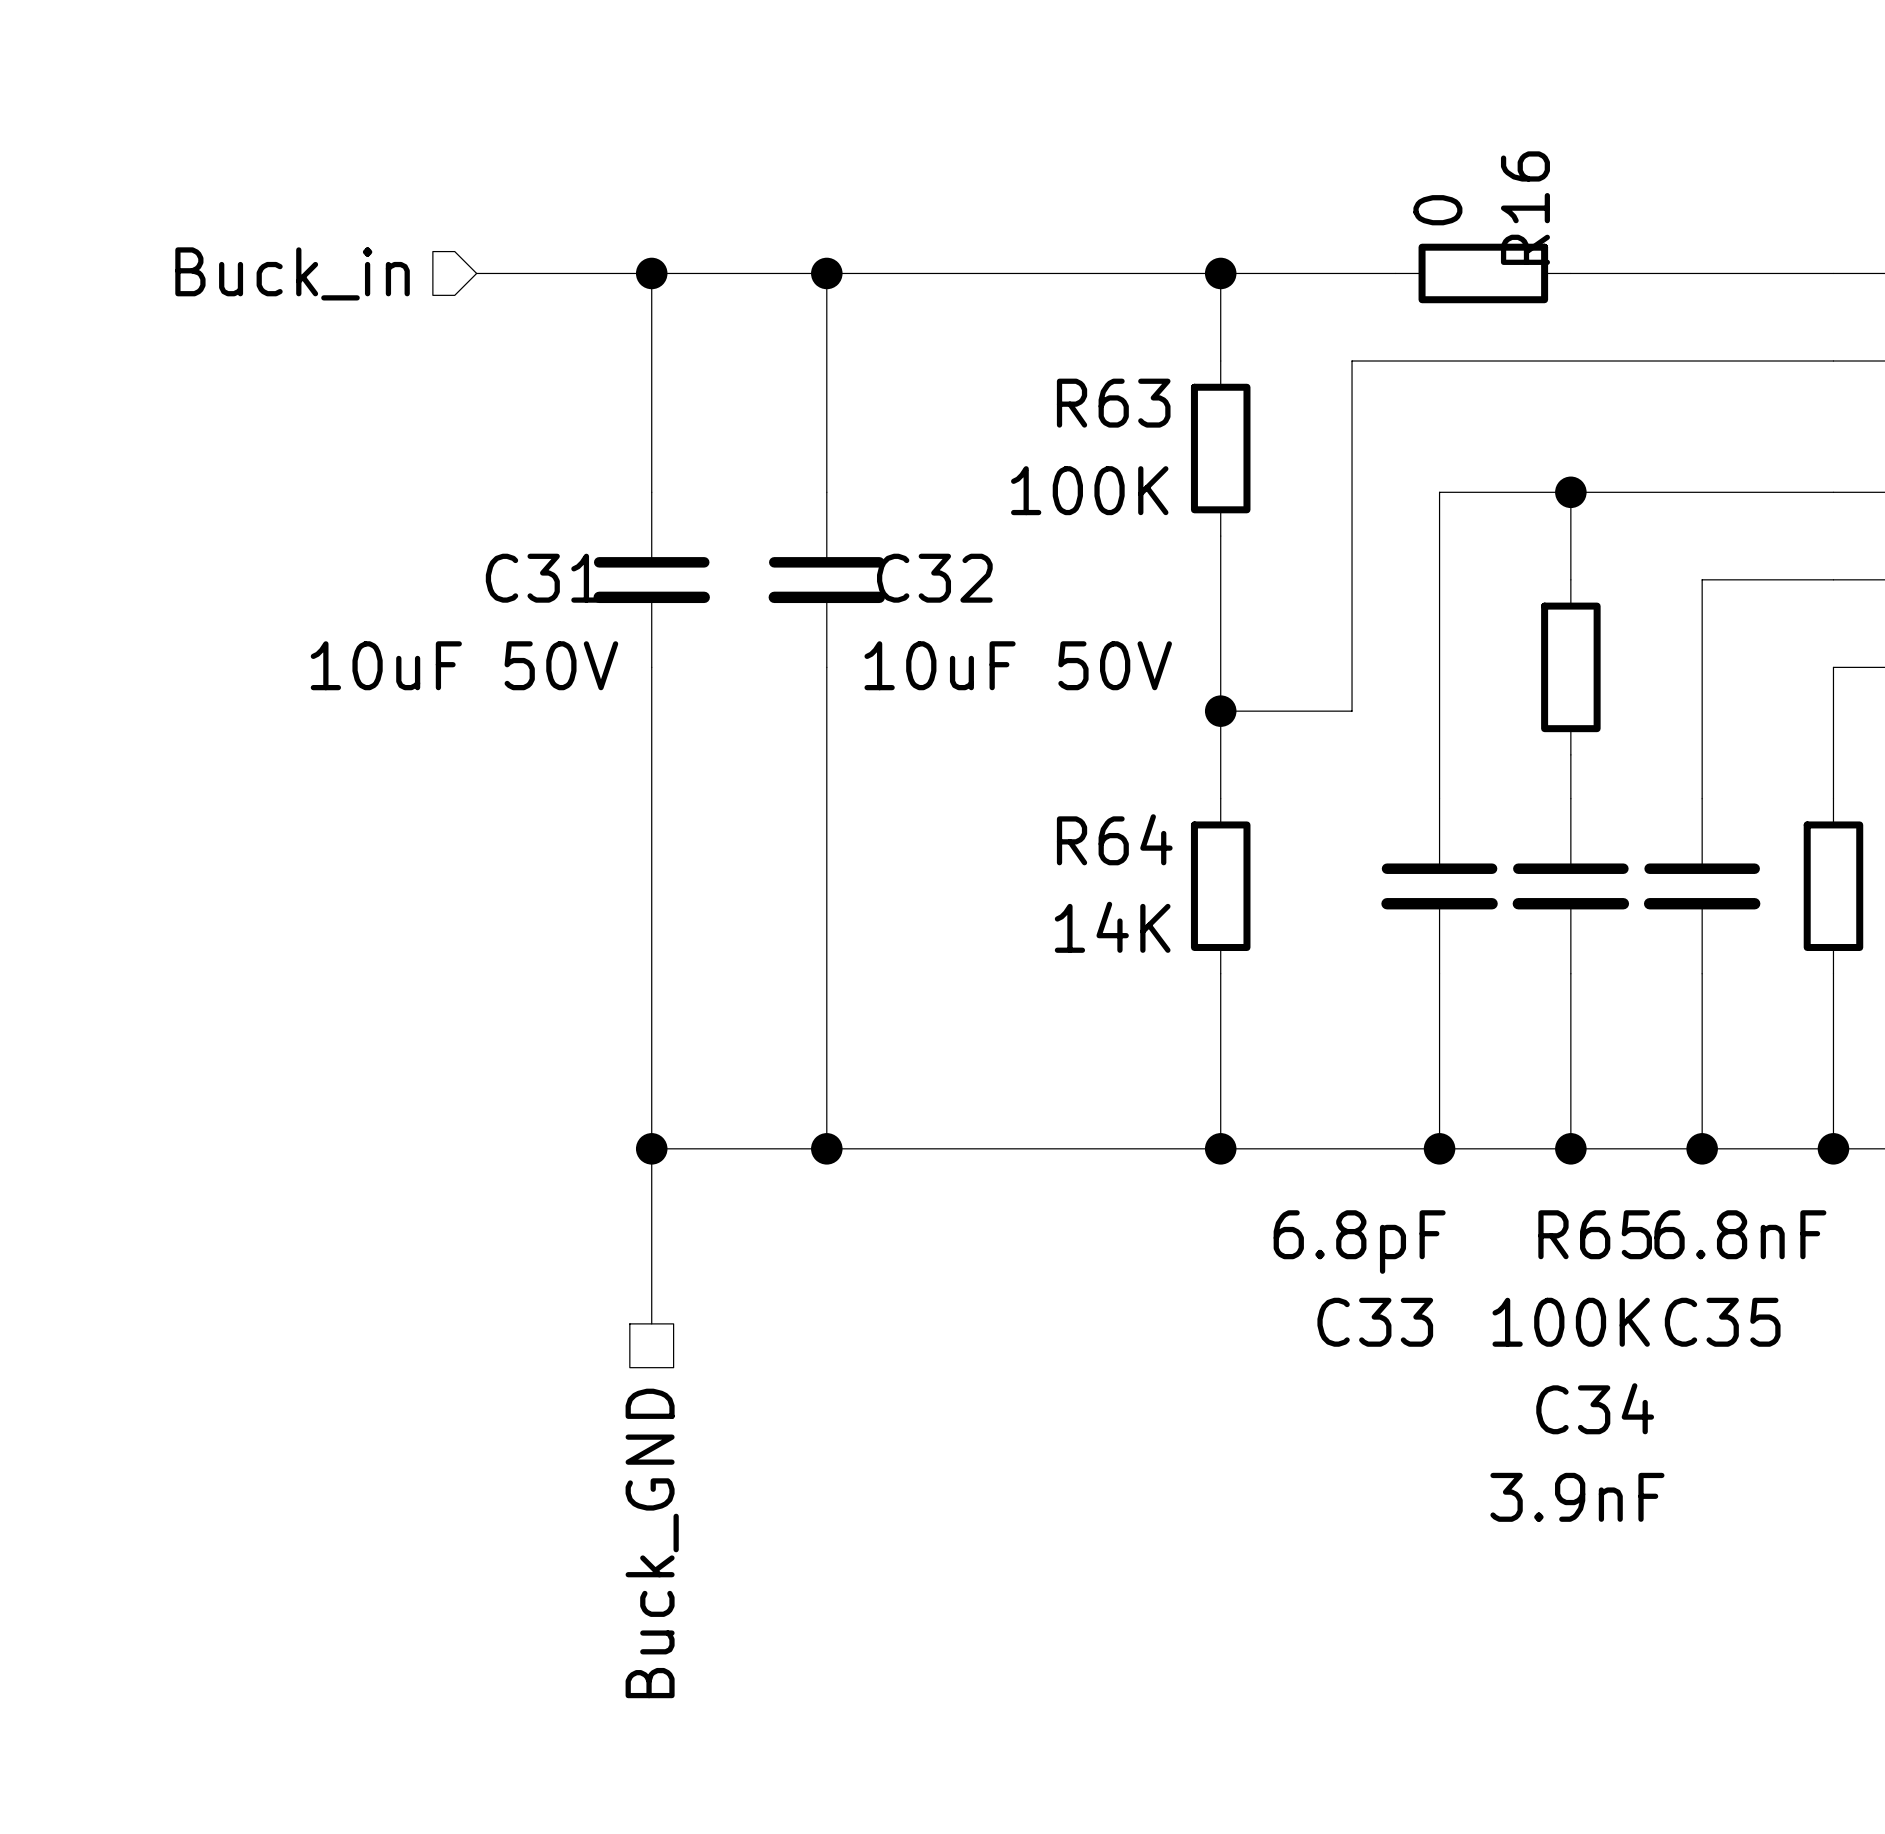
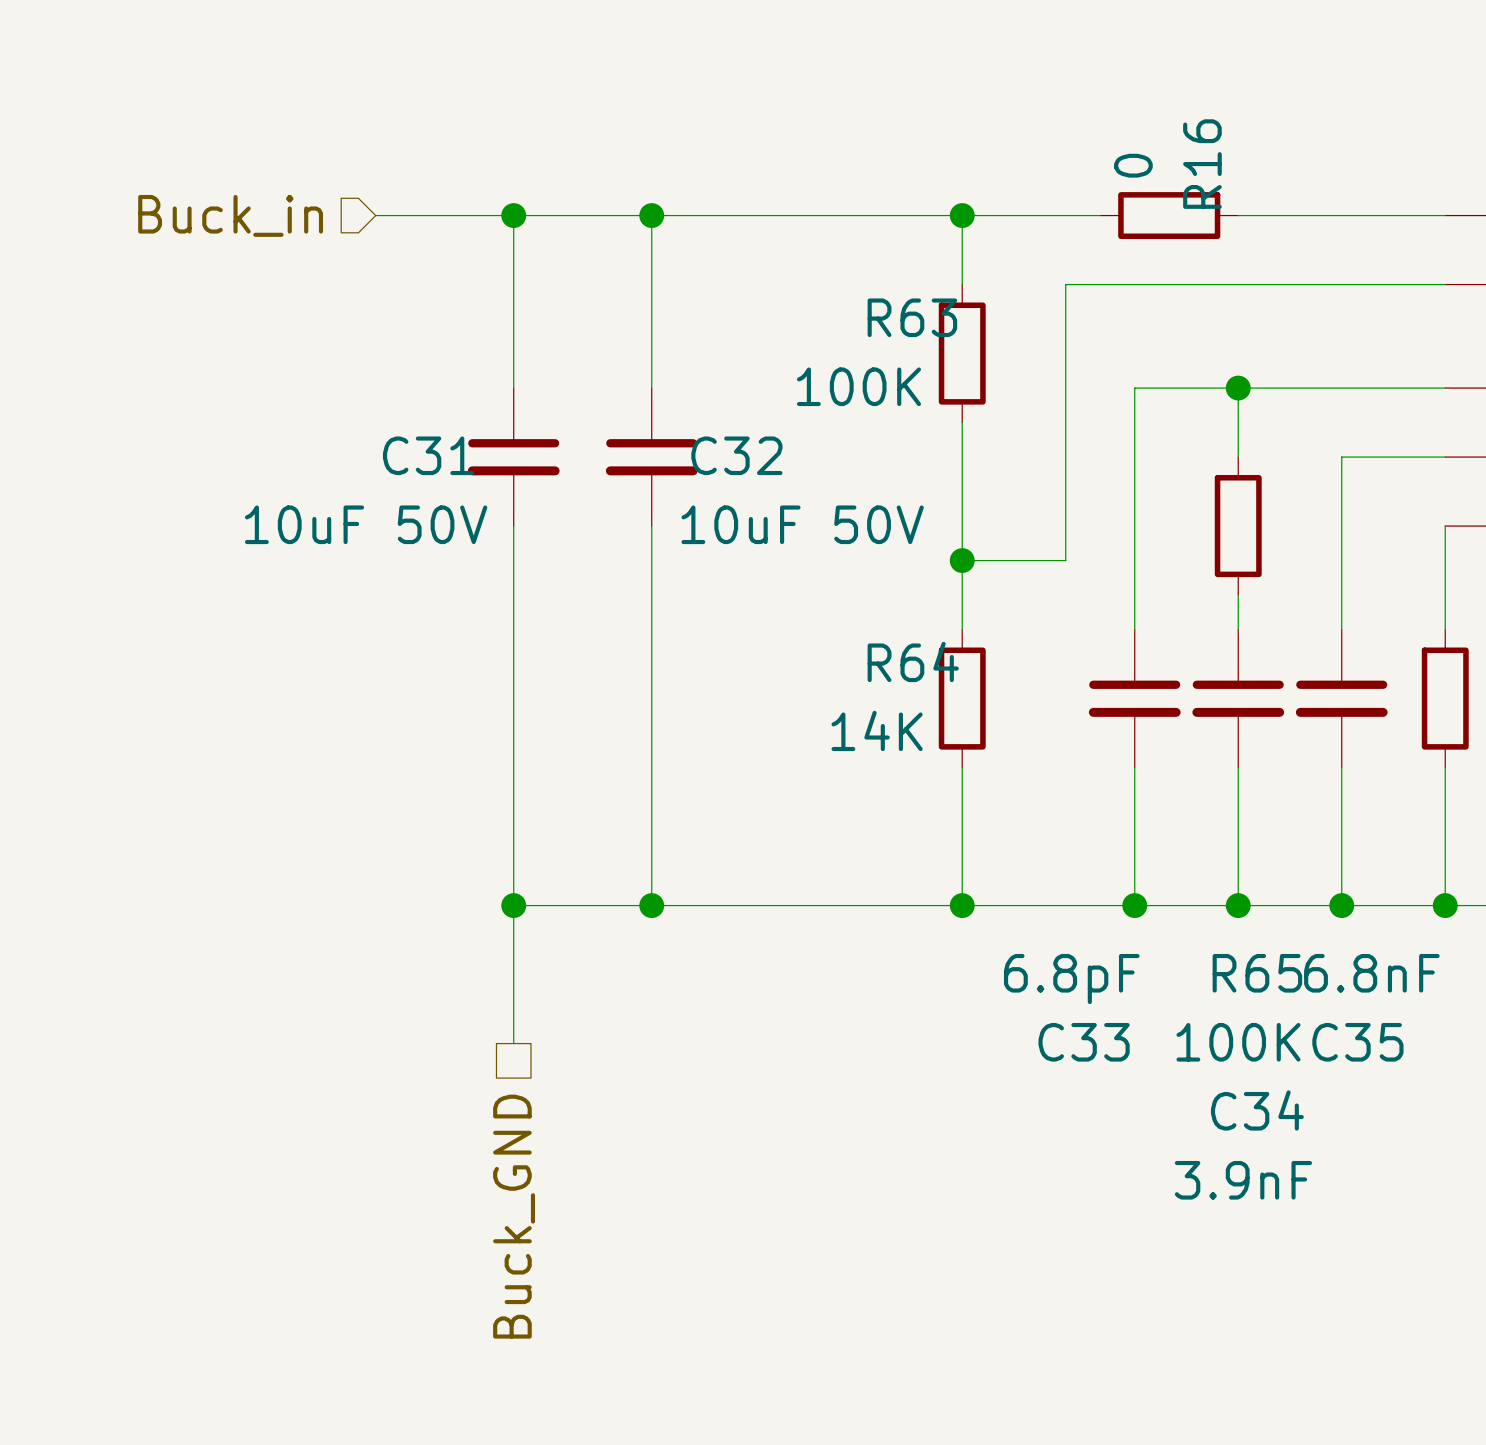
R63 name position: R63 (1113, 403) -> R63 (912, 317)
R64 name position: R64 (1114, 839) -> R64 (913, 661)

